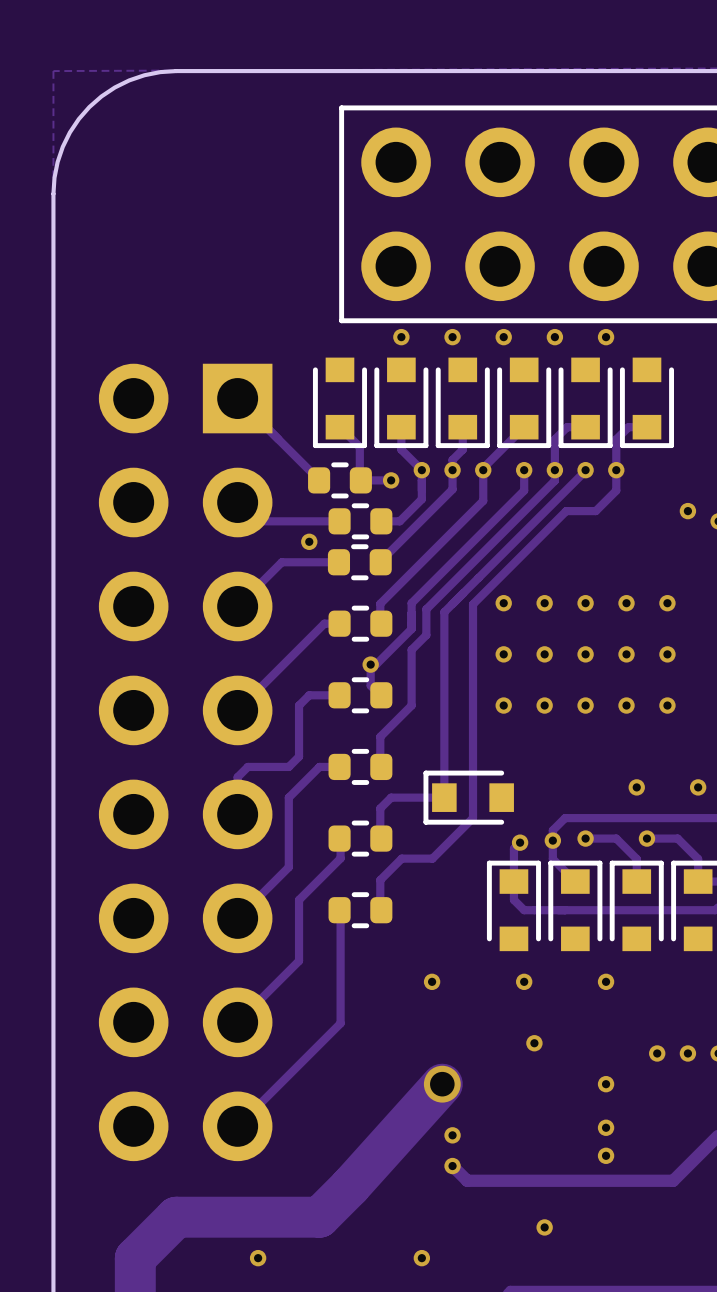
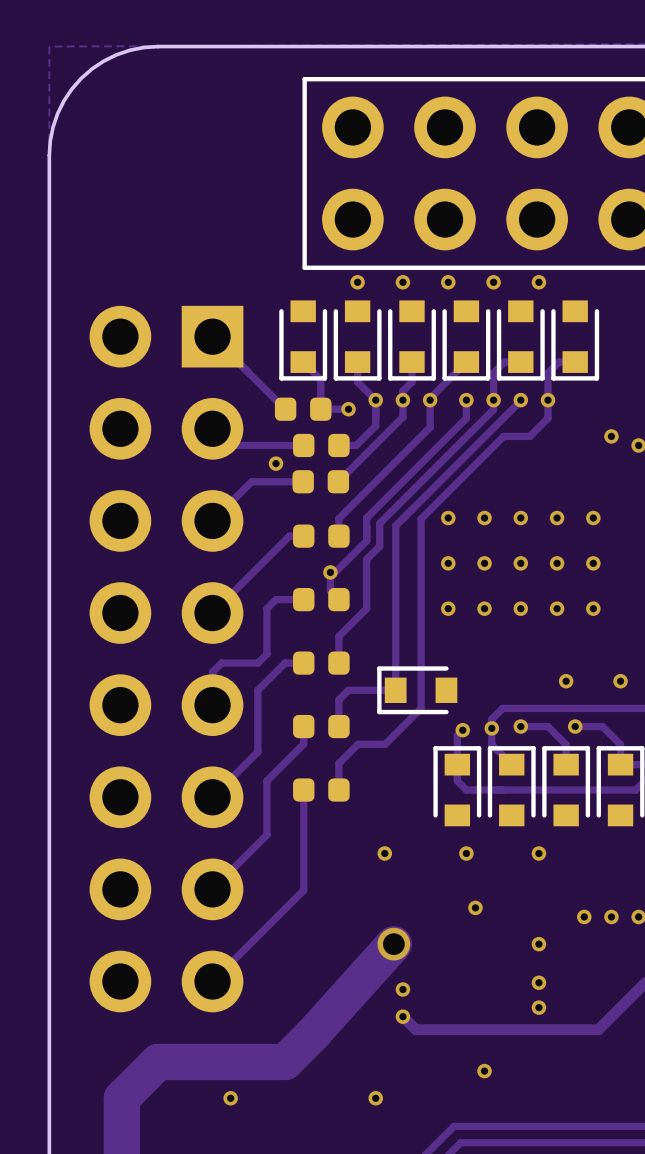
part footprint: [308, 462, 372, 499] -> [274, 397, 332, 421]
part footprint: [328, 503, 393, 540] -> [293, 433, 350, 458]
part footprint: [327, 544, 392, 581] -> [292, 470, 350, 494]
part footprint: [328, 605, 393, 642] -> [293, 524, 350, 548]
part footprint: [328, 677, 393, 714] -> [293, 588, 350, 612]
part footprint: [328, 748, 393, 785] -> [293, 651, 350, 675]
part footprint: [328, 820, 393, 857] -> [293, 714, 350, 739]
part footprint: [328, 892, 393, 929] -> [293, 778, 350, 802]

